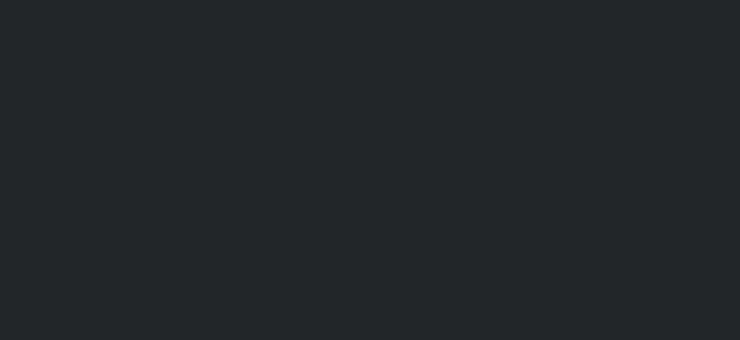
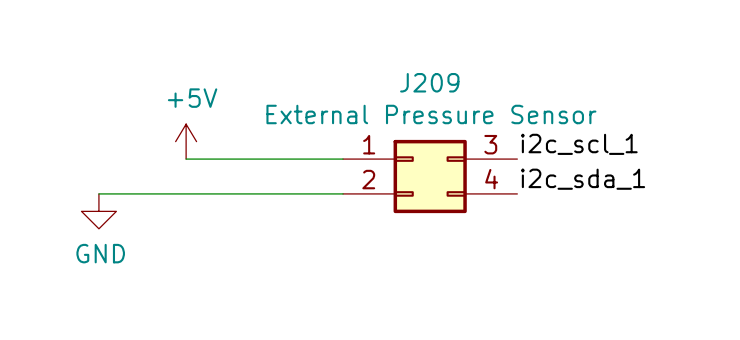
power symbol: none -> +5V (186, 141)
label: none -> i2c_scl_1 (579, 144)
wire: none -> (186, 159) (343, 159)
J209: none -> External Pressure Sensor (430, 176)
label: none -> i2c_sda_1 (583, 179)
wire: none -> (98, 193) (343, 193)
power symbol: none -> GND (98, 211)

